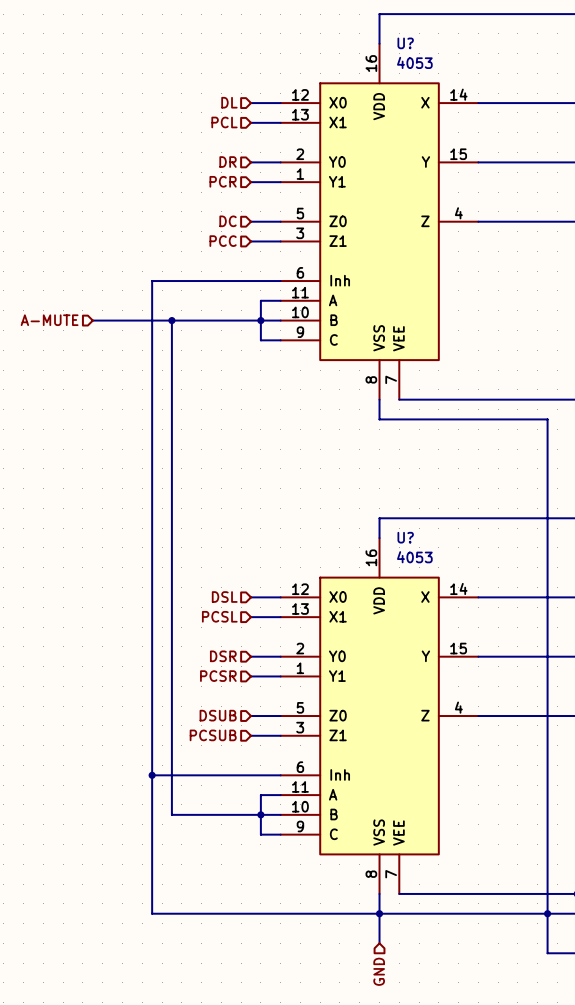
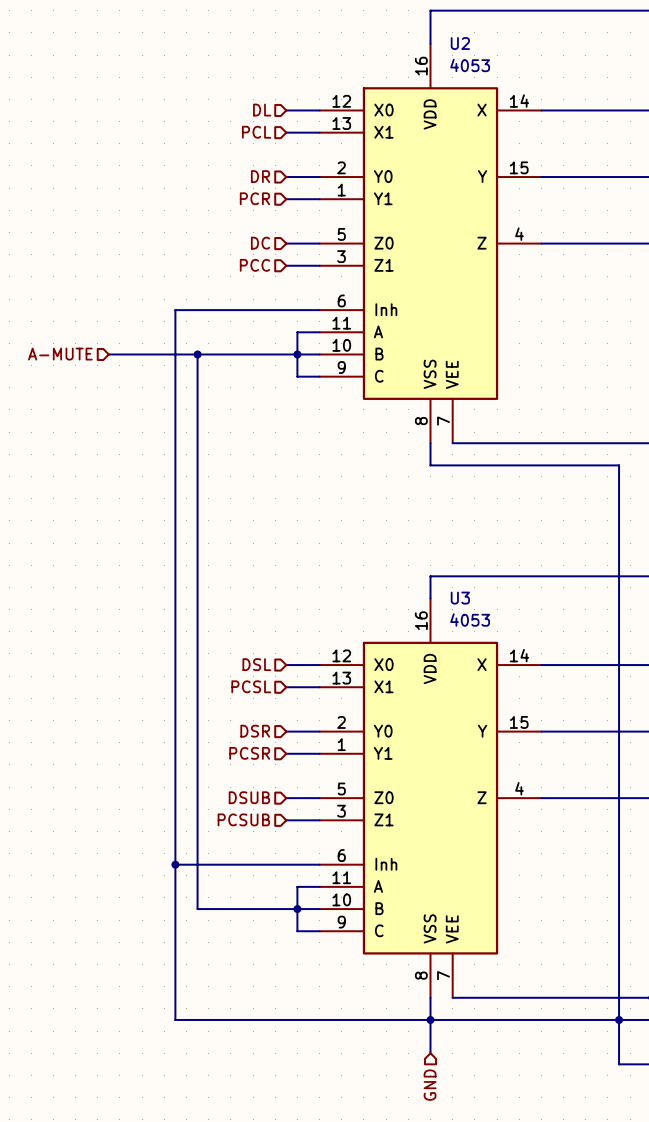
U? name: U? (405, 43) -> U2 (460, 43)
U? name: U? (405, 537) -> U3 (460, 598)

